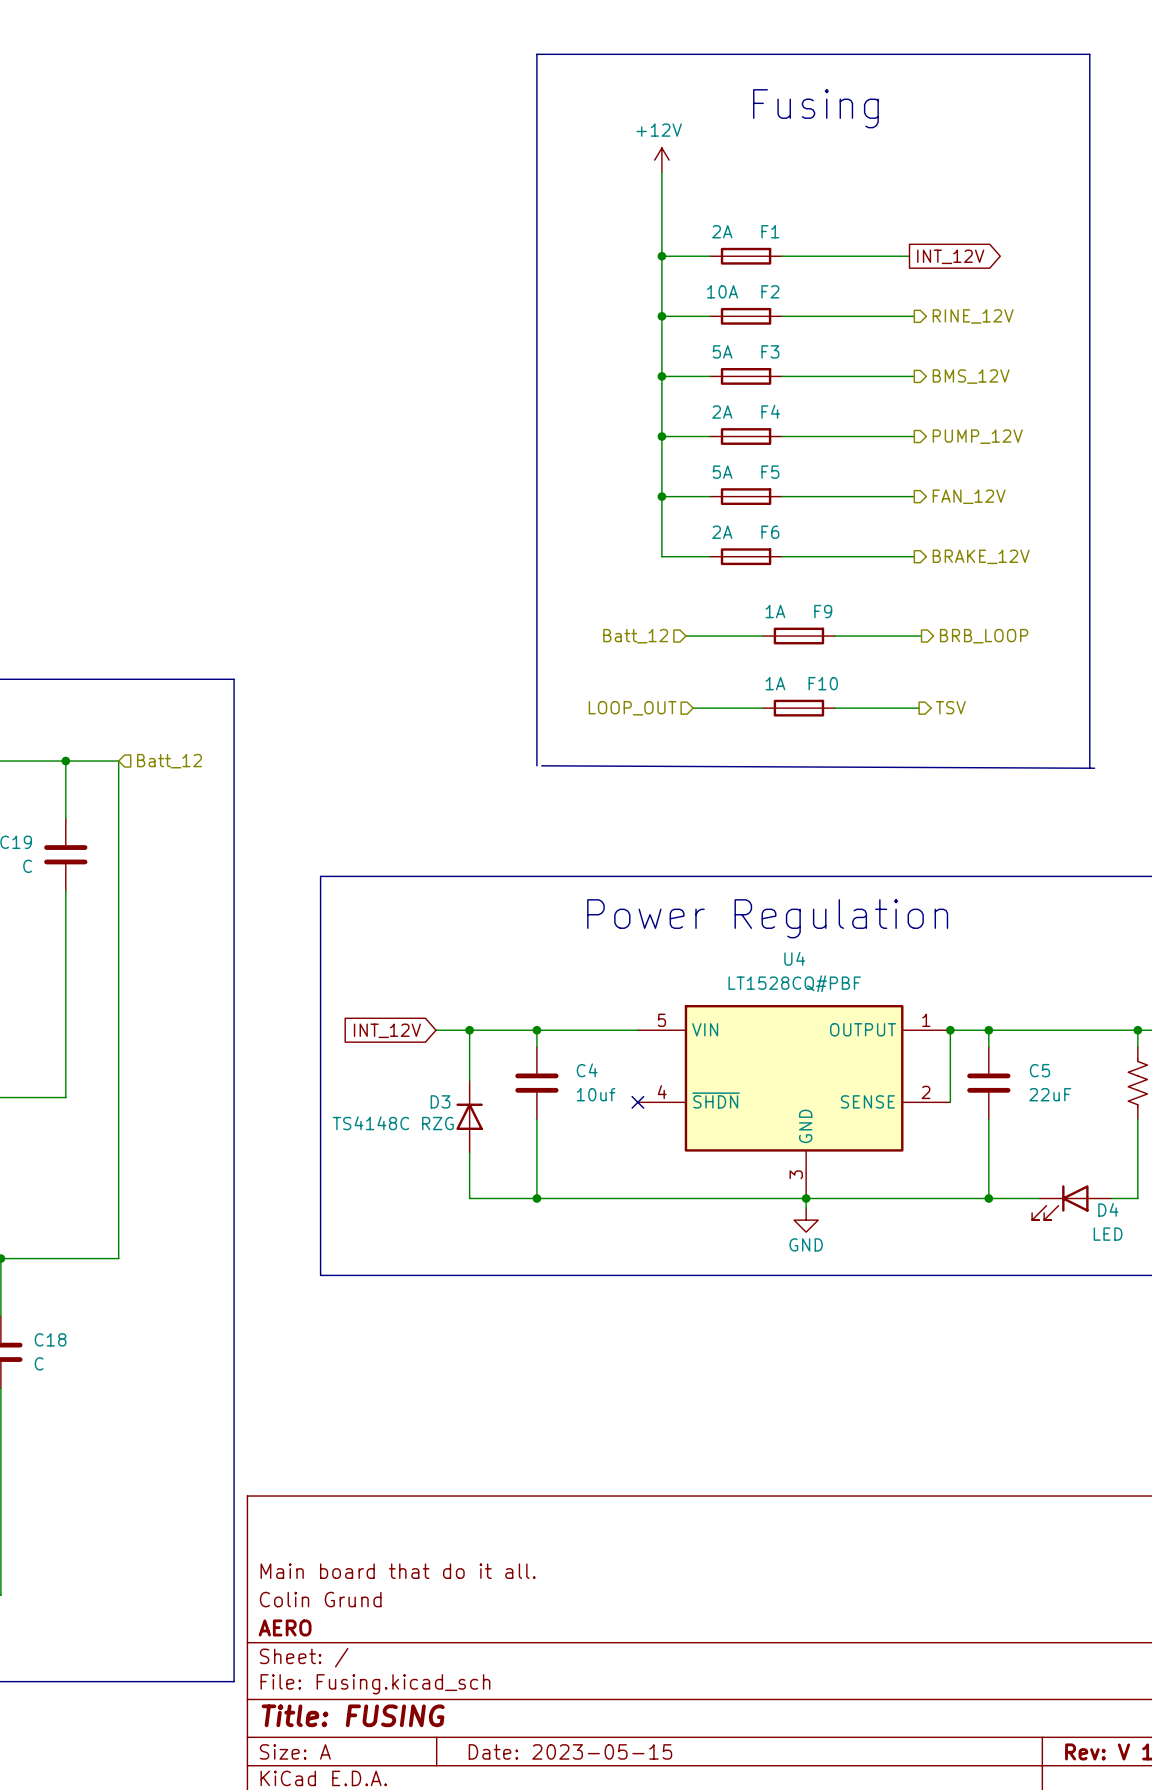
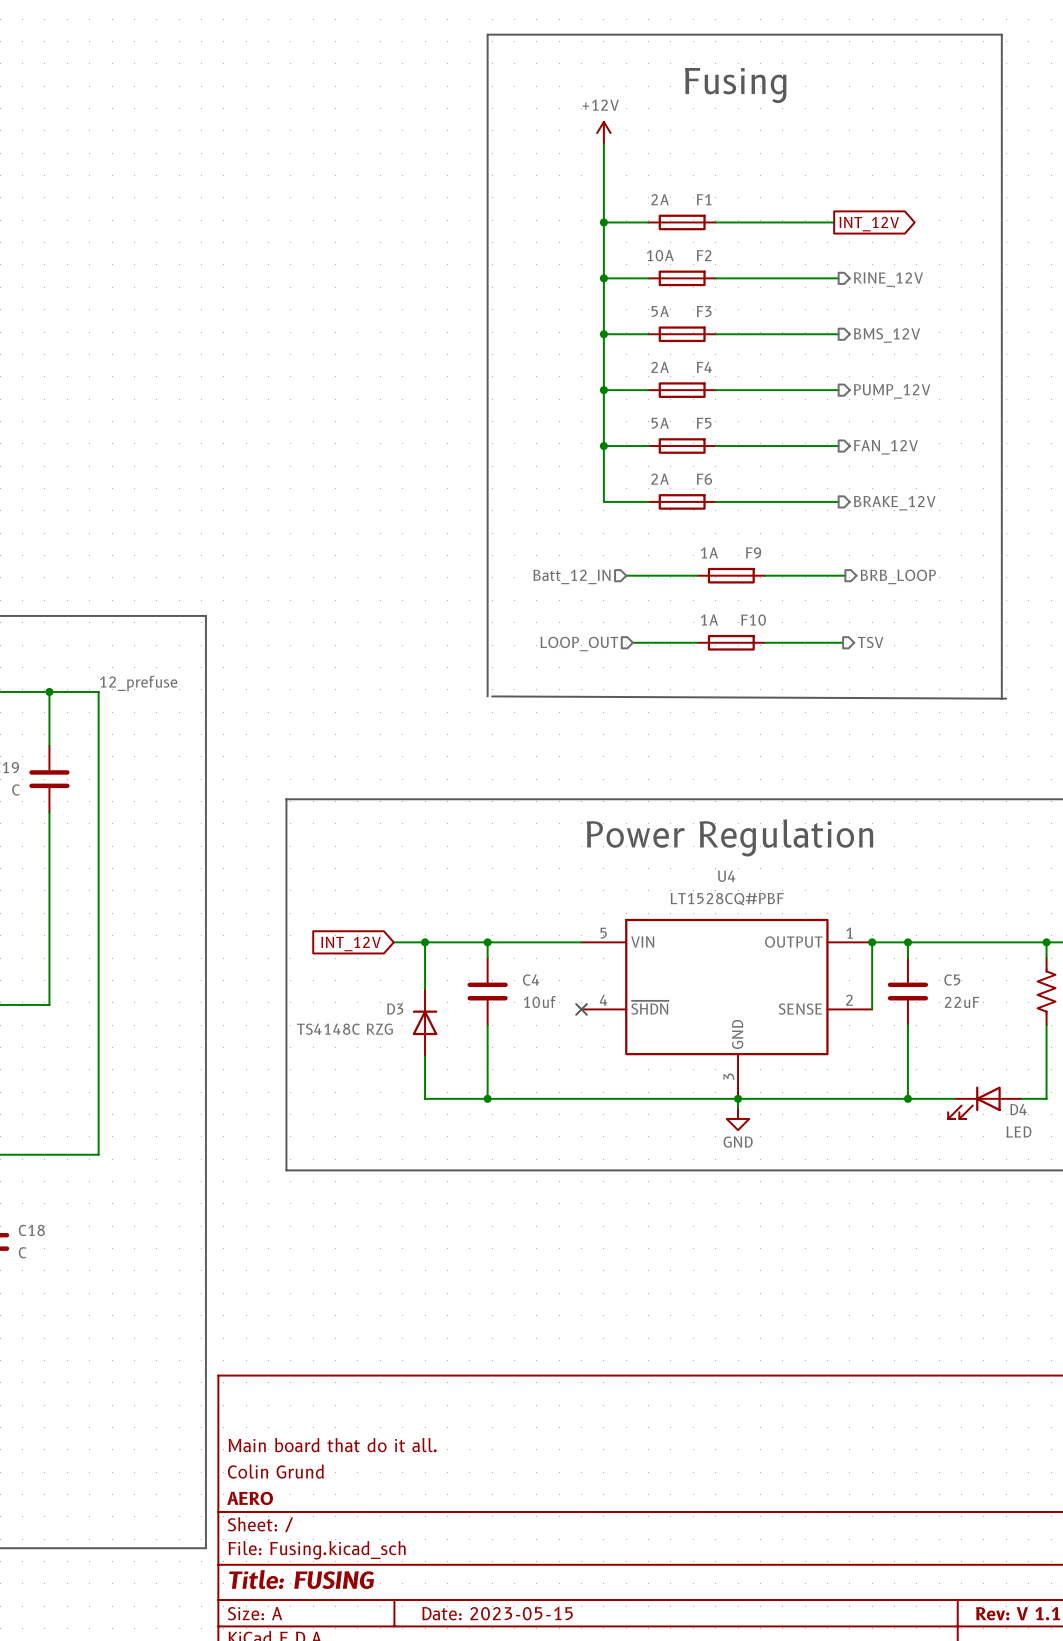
hierarchical label: Batt_12 (635, 636) -> Batt_12_IN (571, 576)
label: none -> 12_prefuse (138, 683)
hierarchical label: Batt_12 (169, 761) -> none

